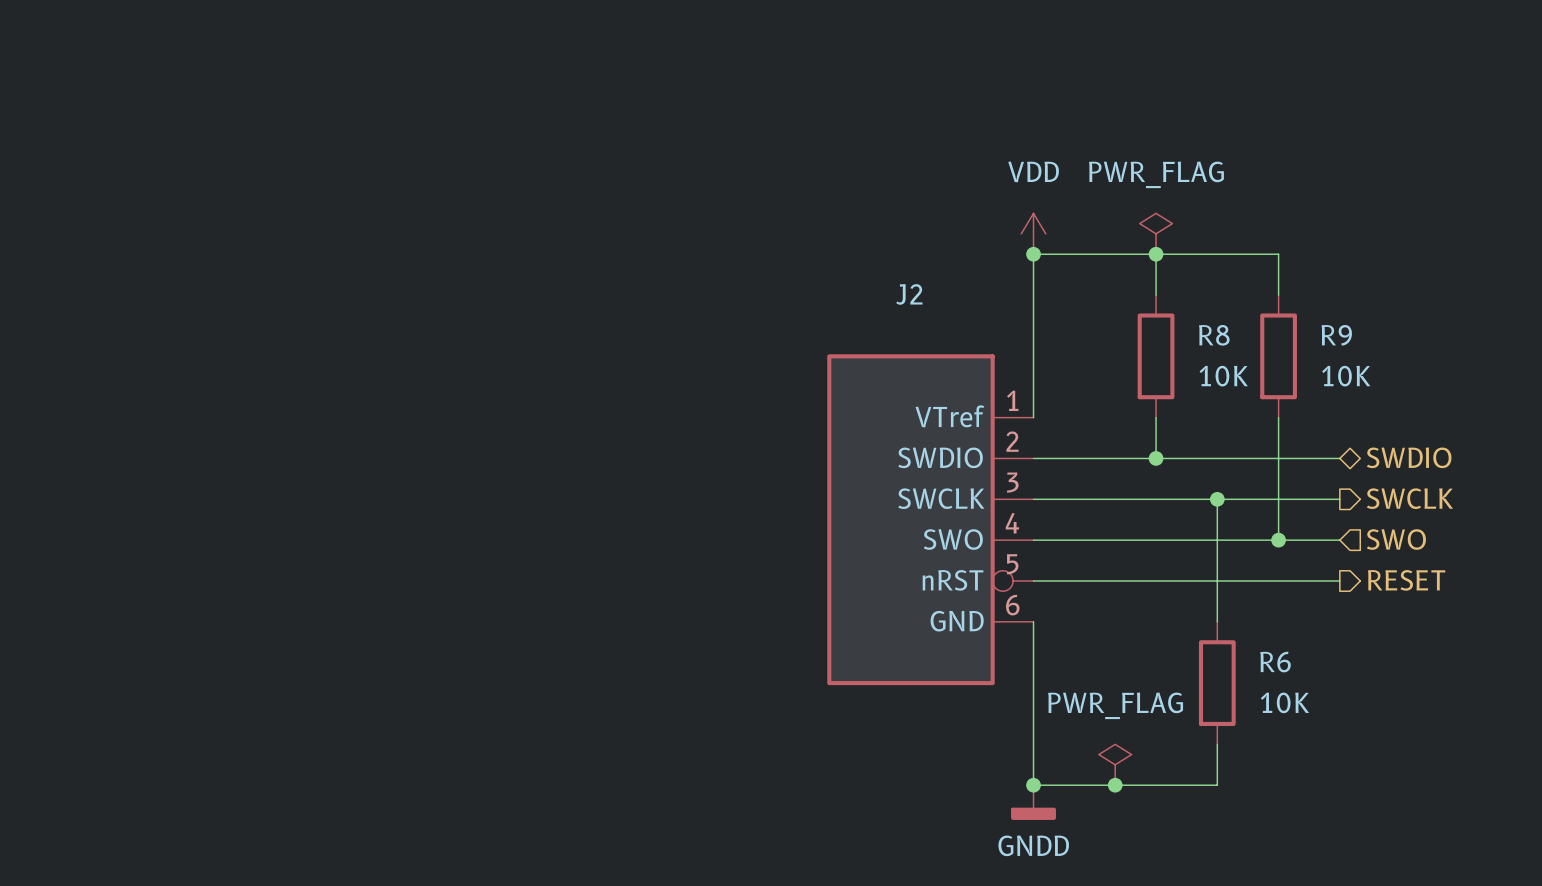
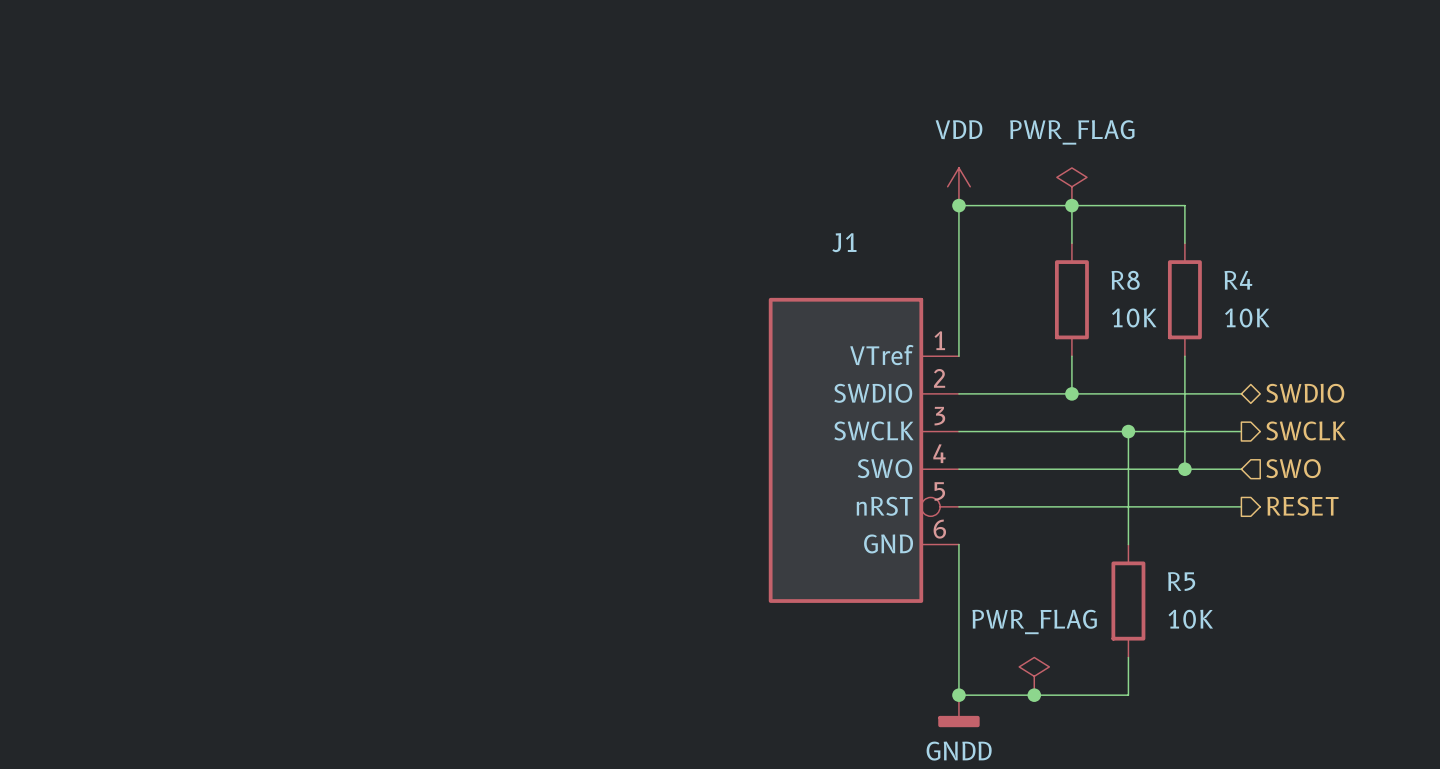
J2 name: J2 (909, 294) -> J1 (844, 242)
R9 name: R9 (1336, 335) -> R4 (1238, 280)
R6 name: R6 (1275, 662) -> R5 (1181, 581)

